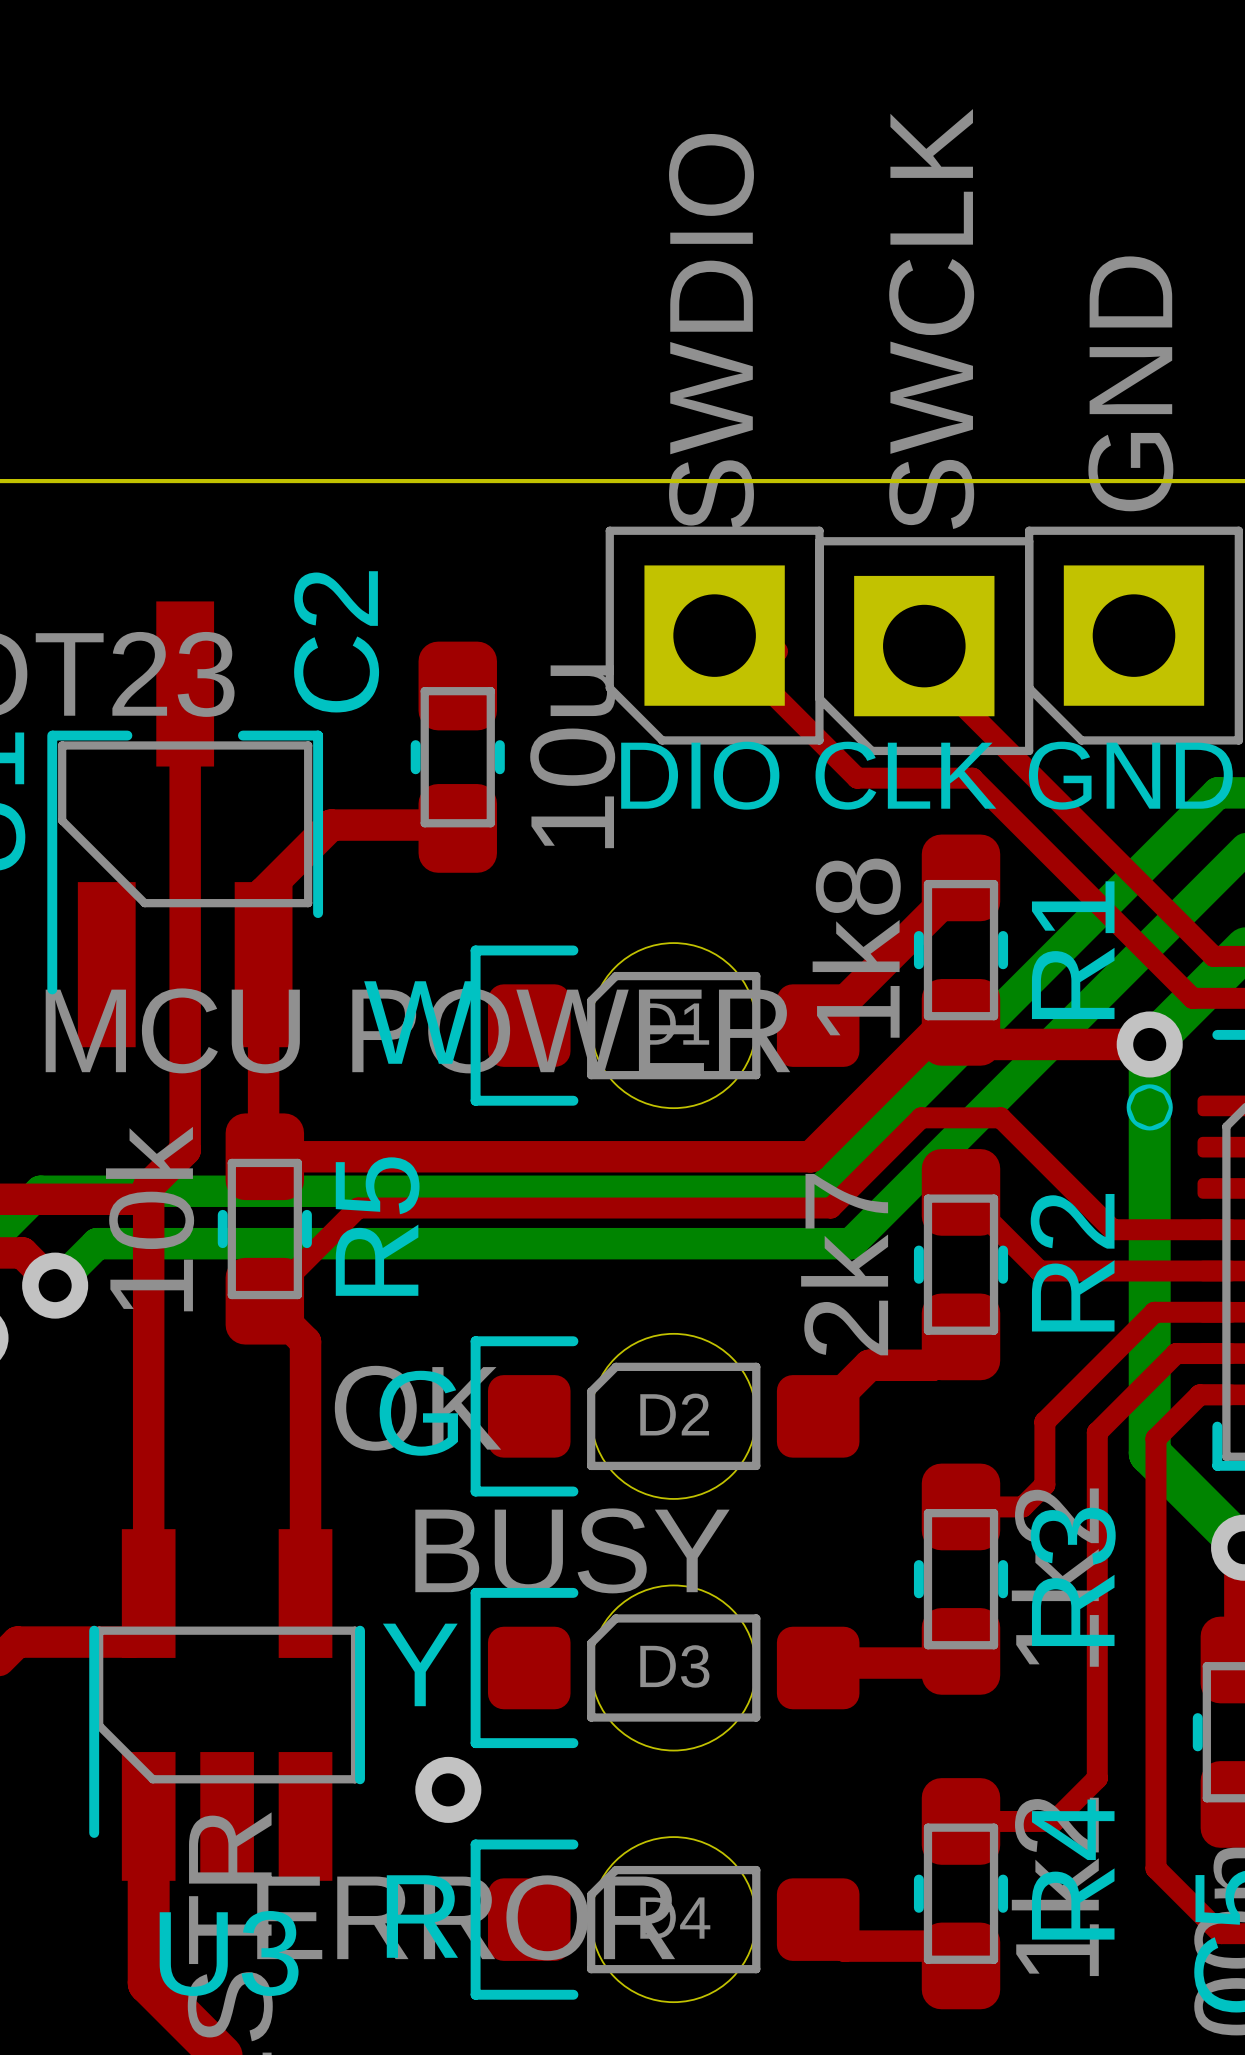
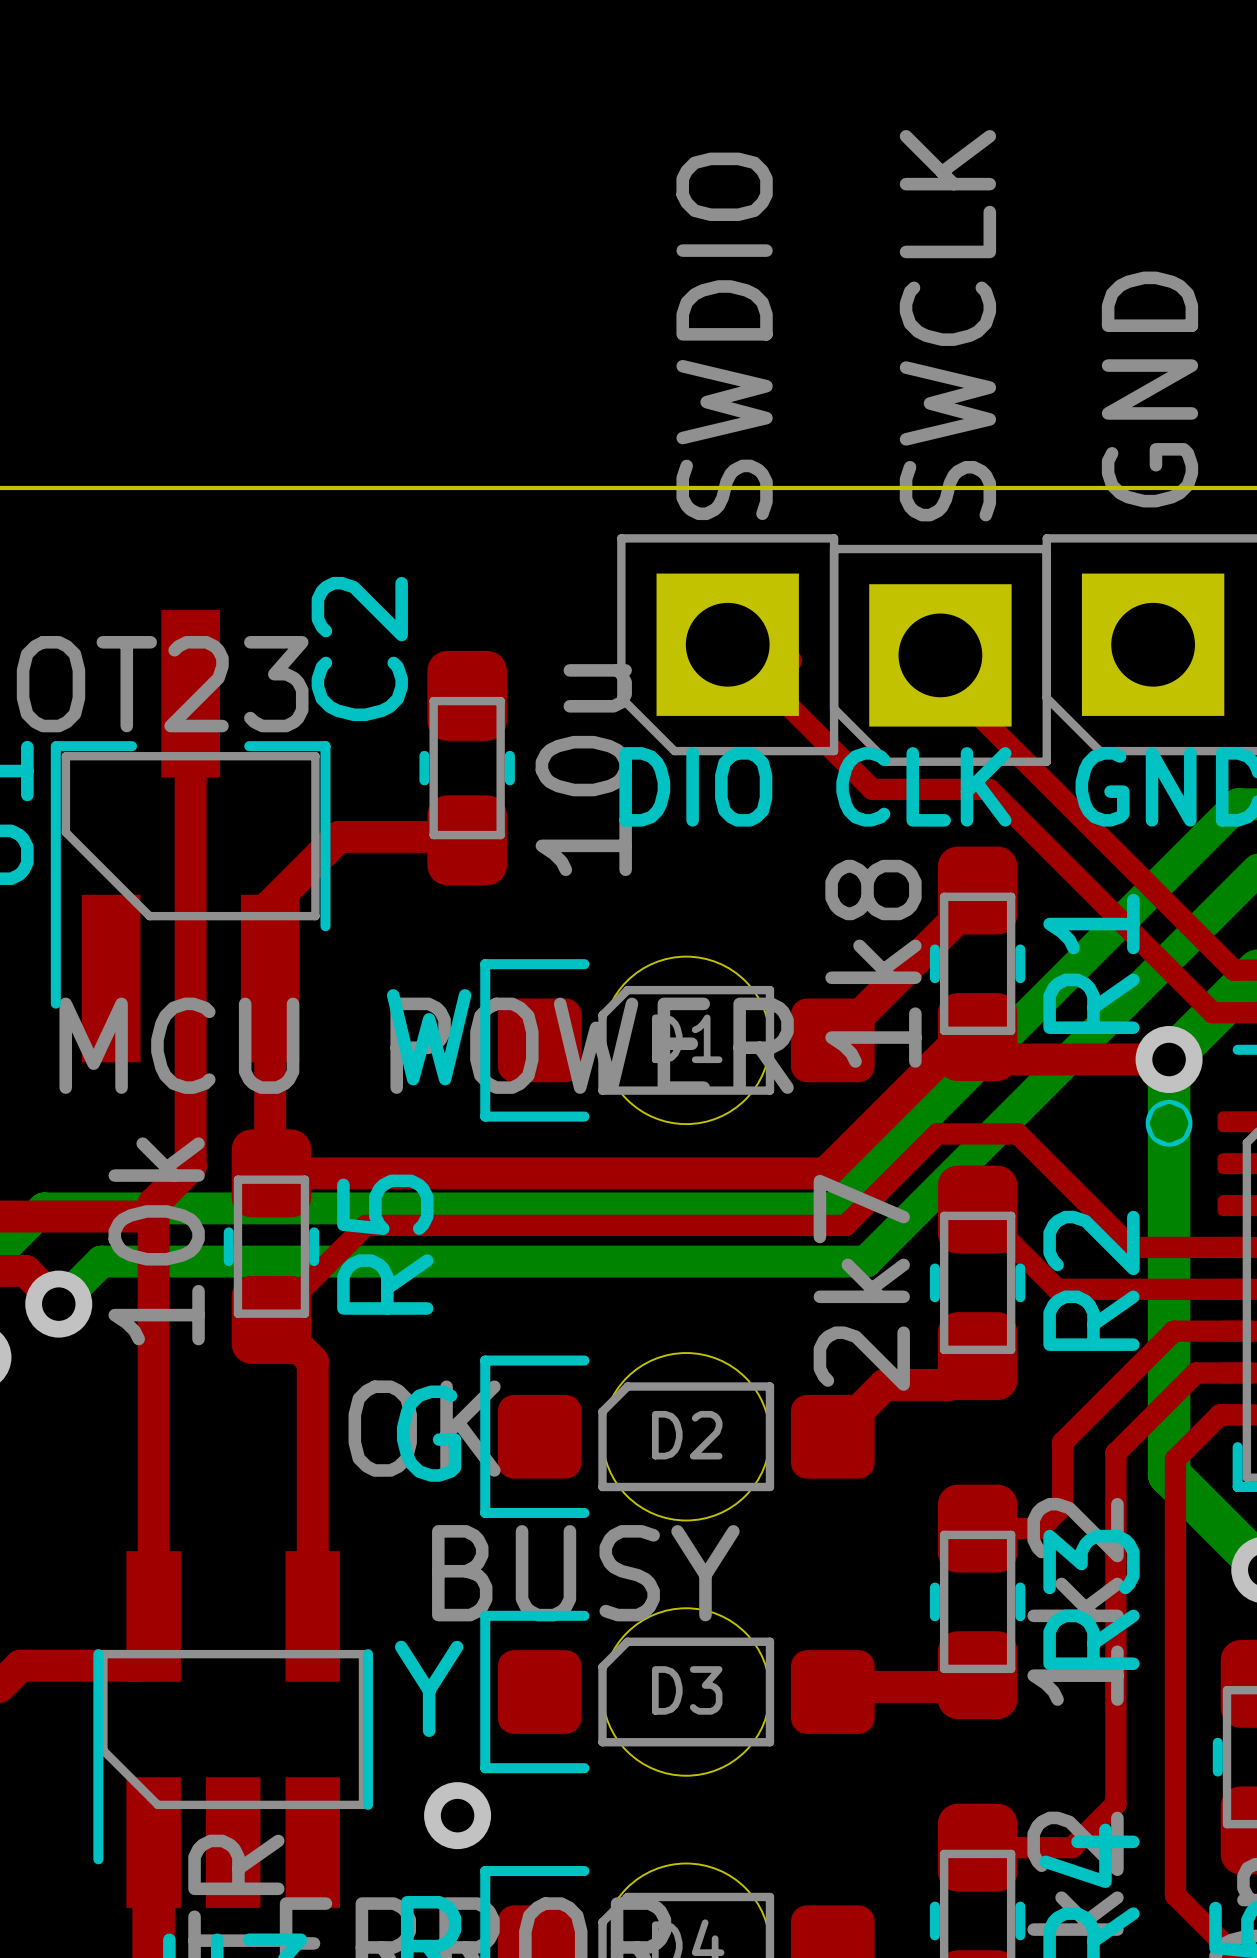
C2 name position: C2 (336, 641) -> C2 (359, 648)

